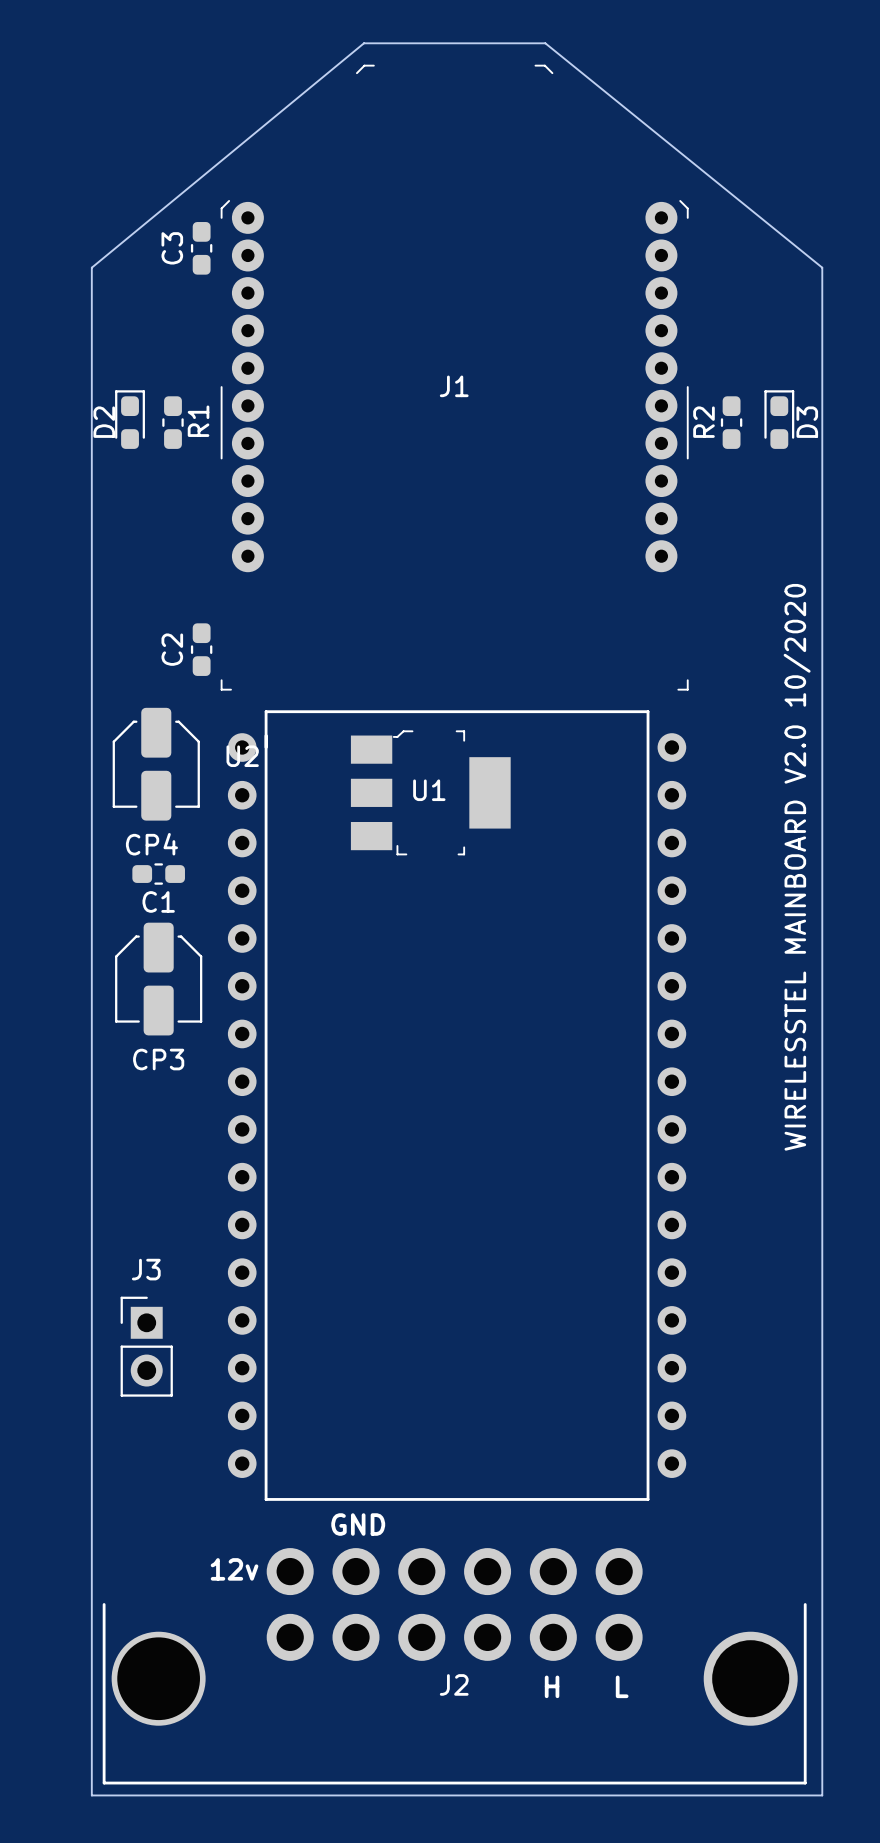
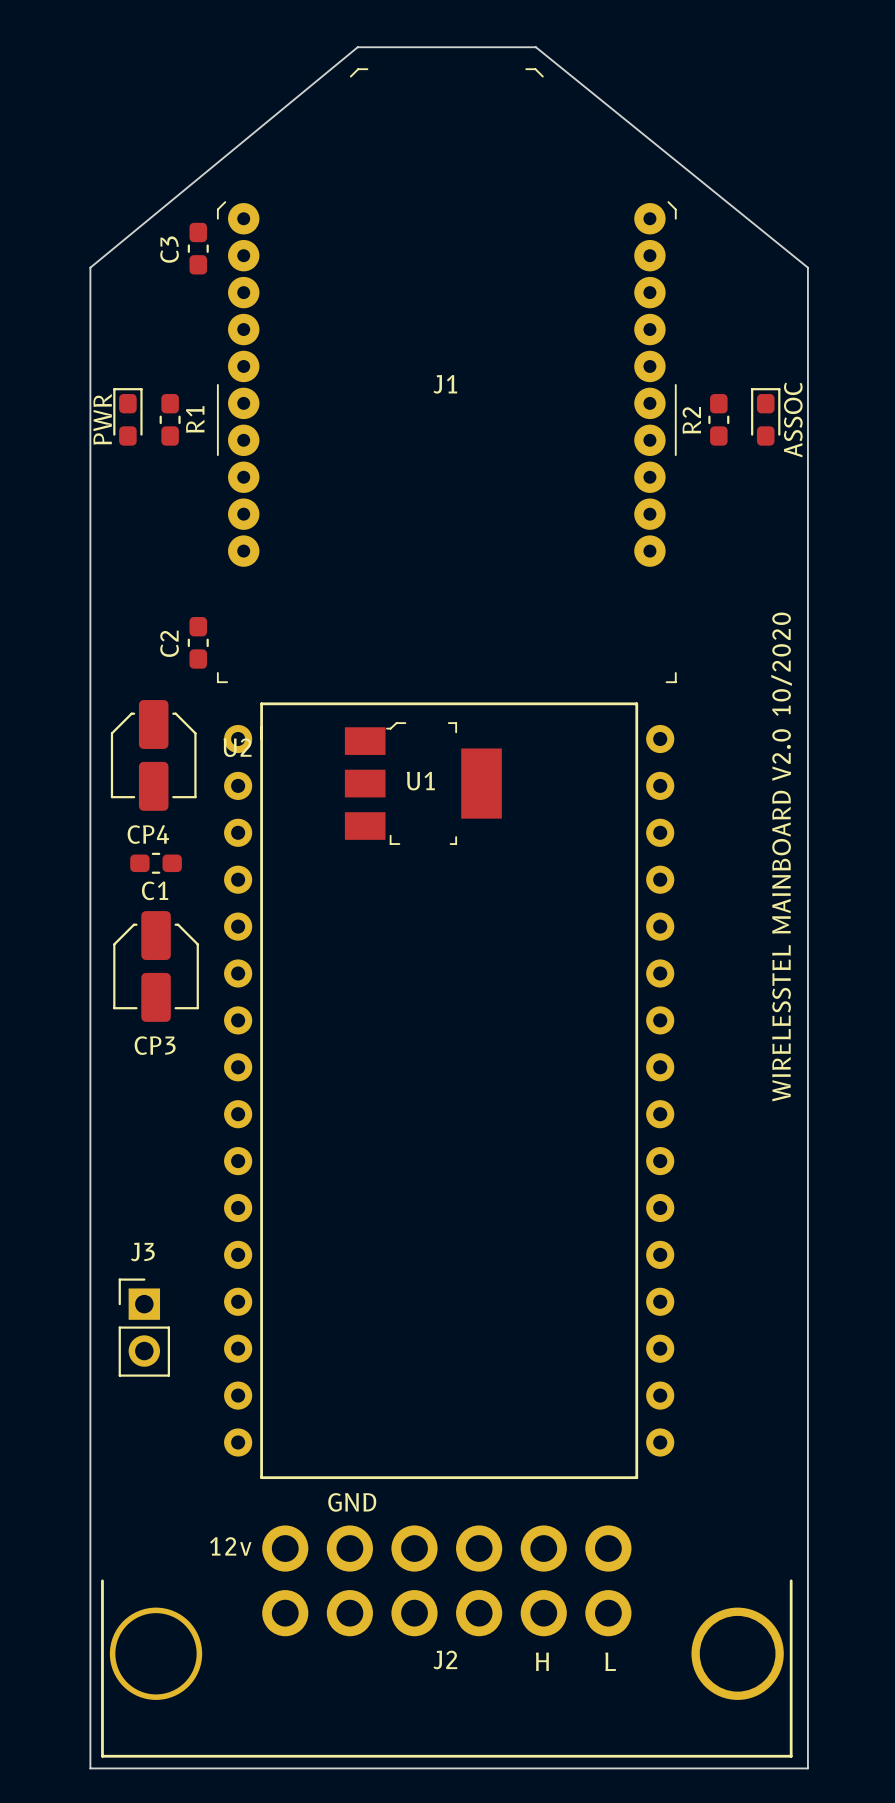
D2 name: D2 (104, 422) -> PWR (102, 419)
D3 name: D3 (807, 422) -> ASSOC (793, 419)

